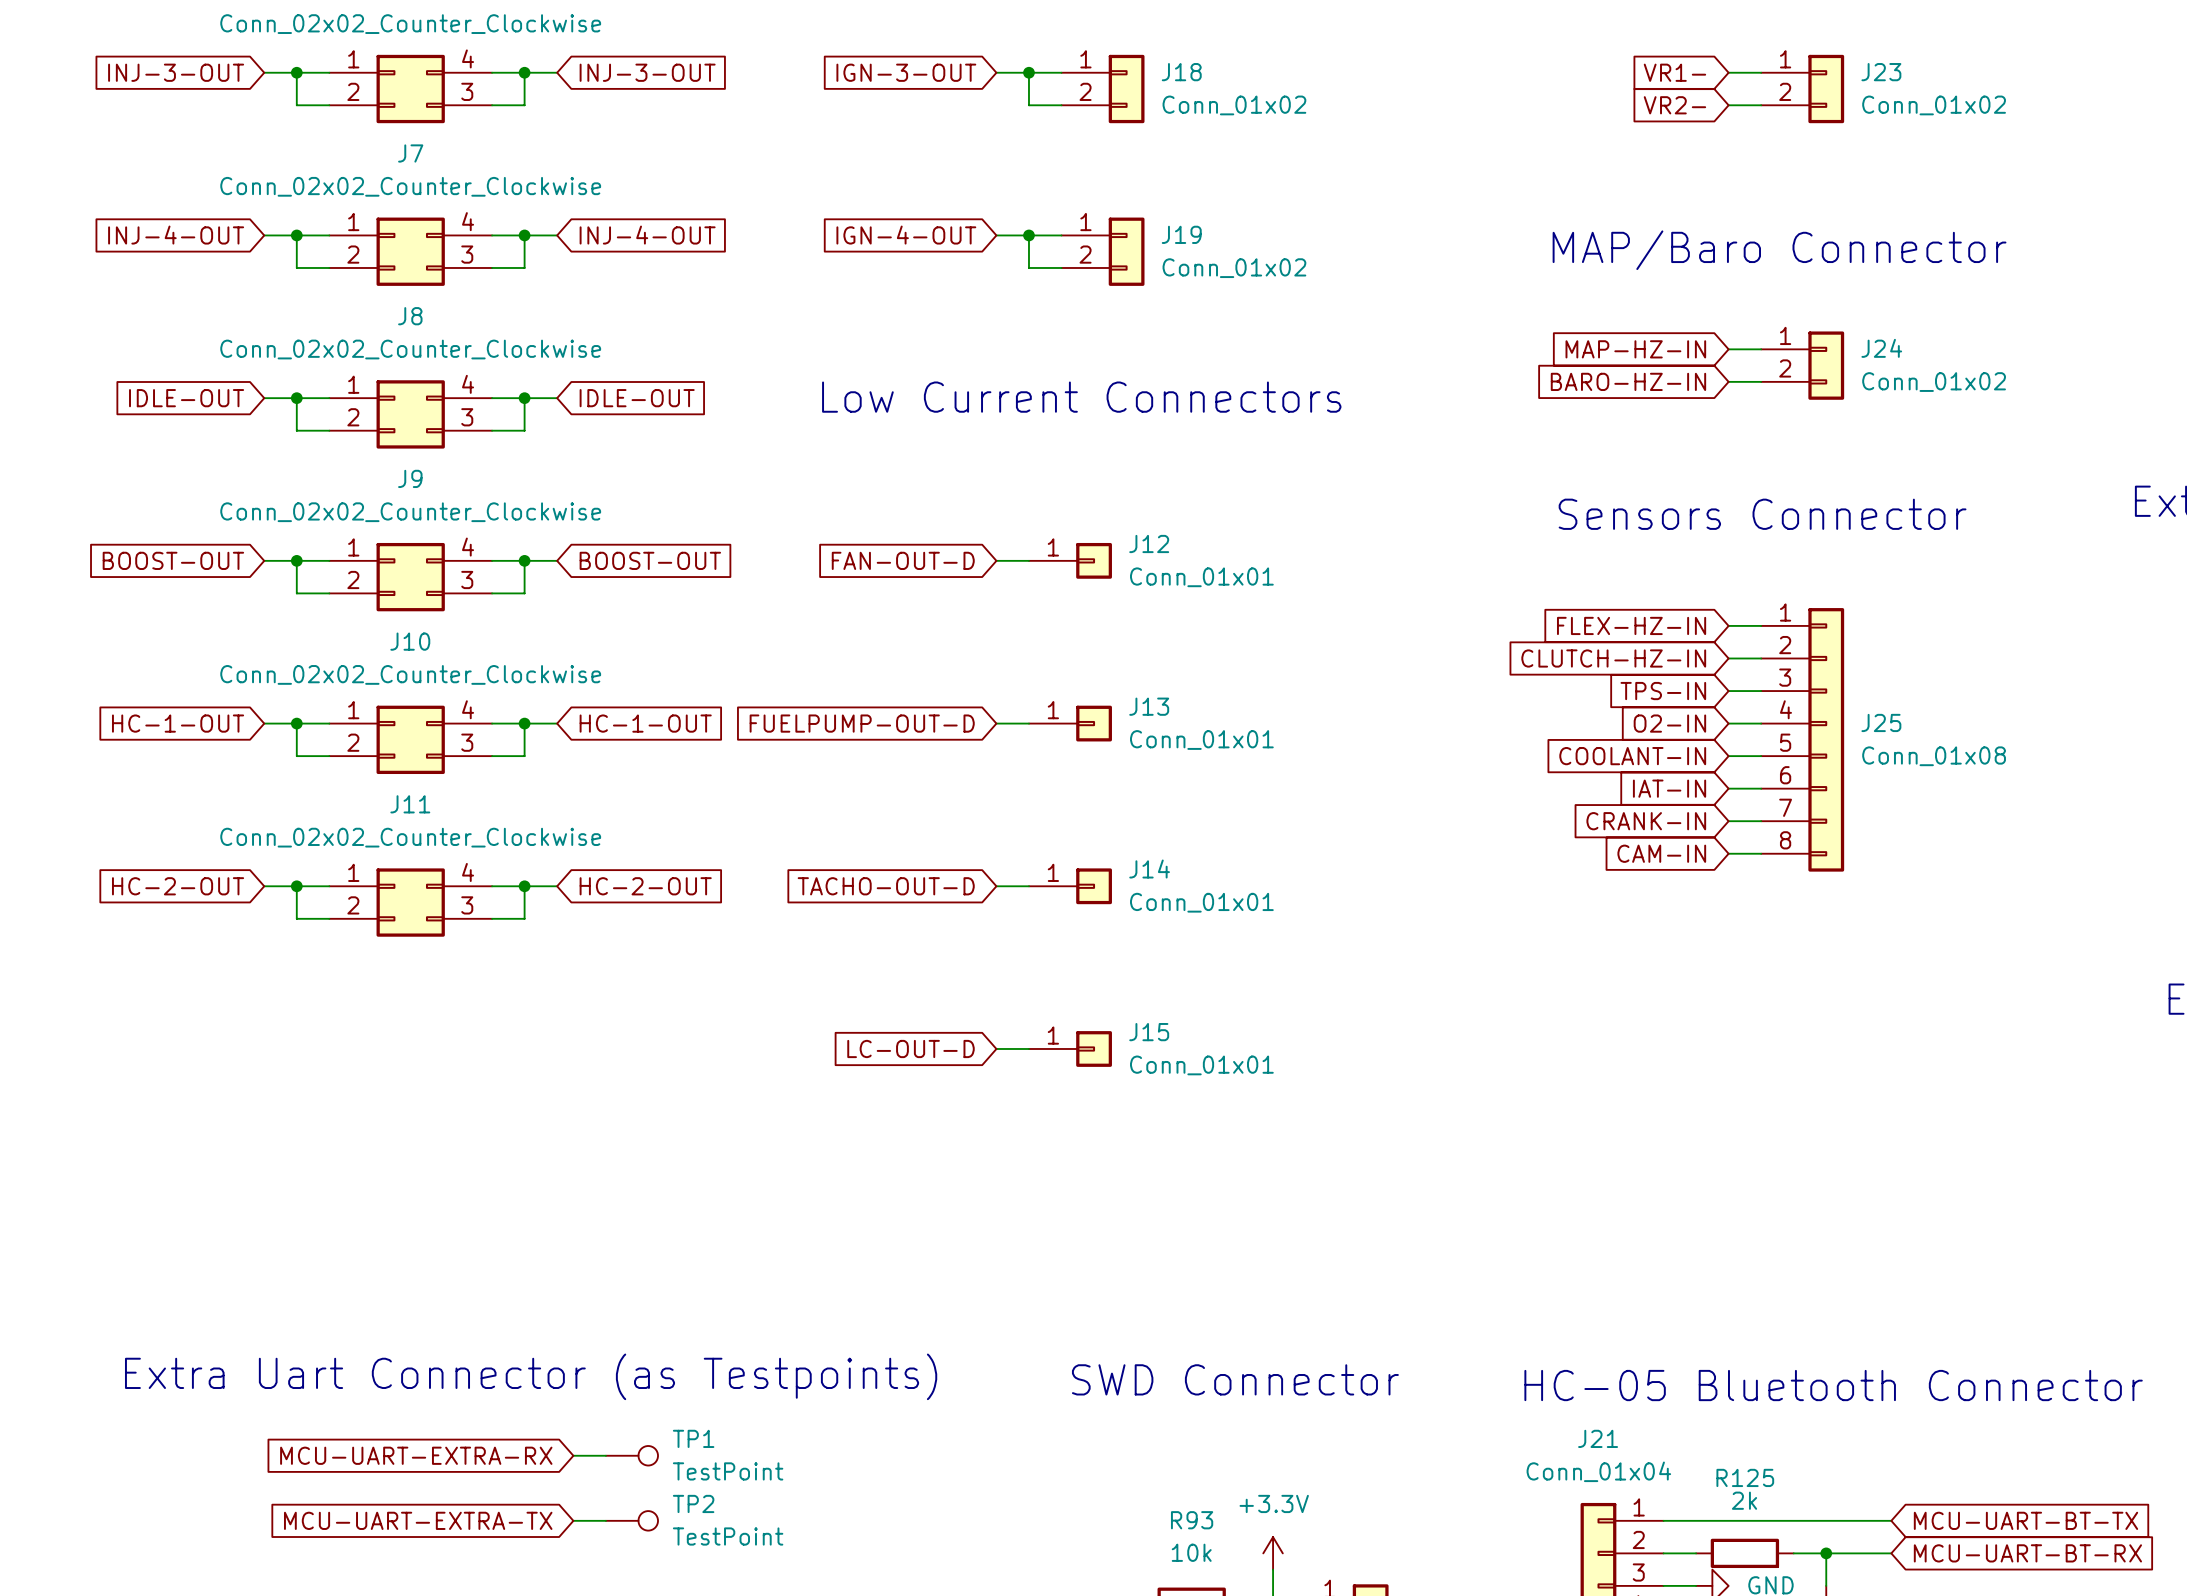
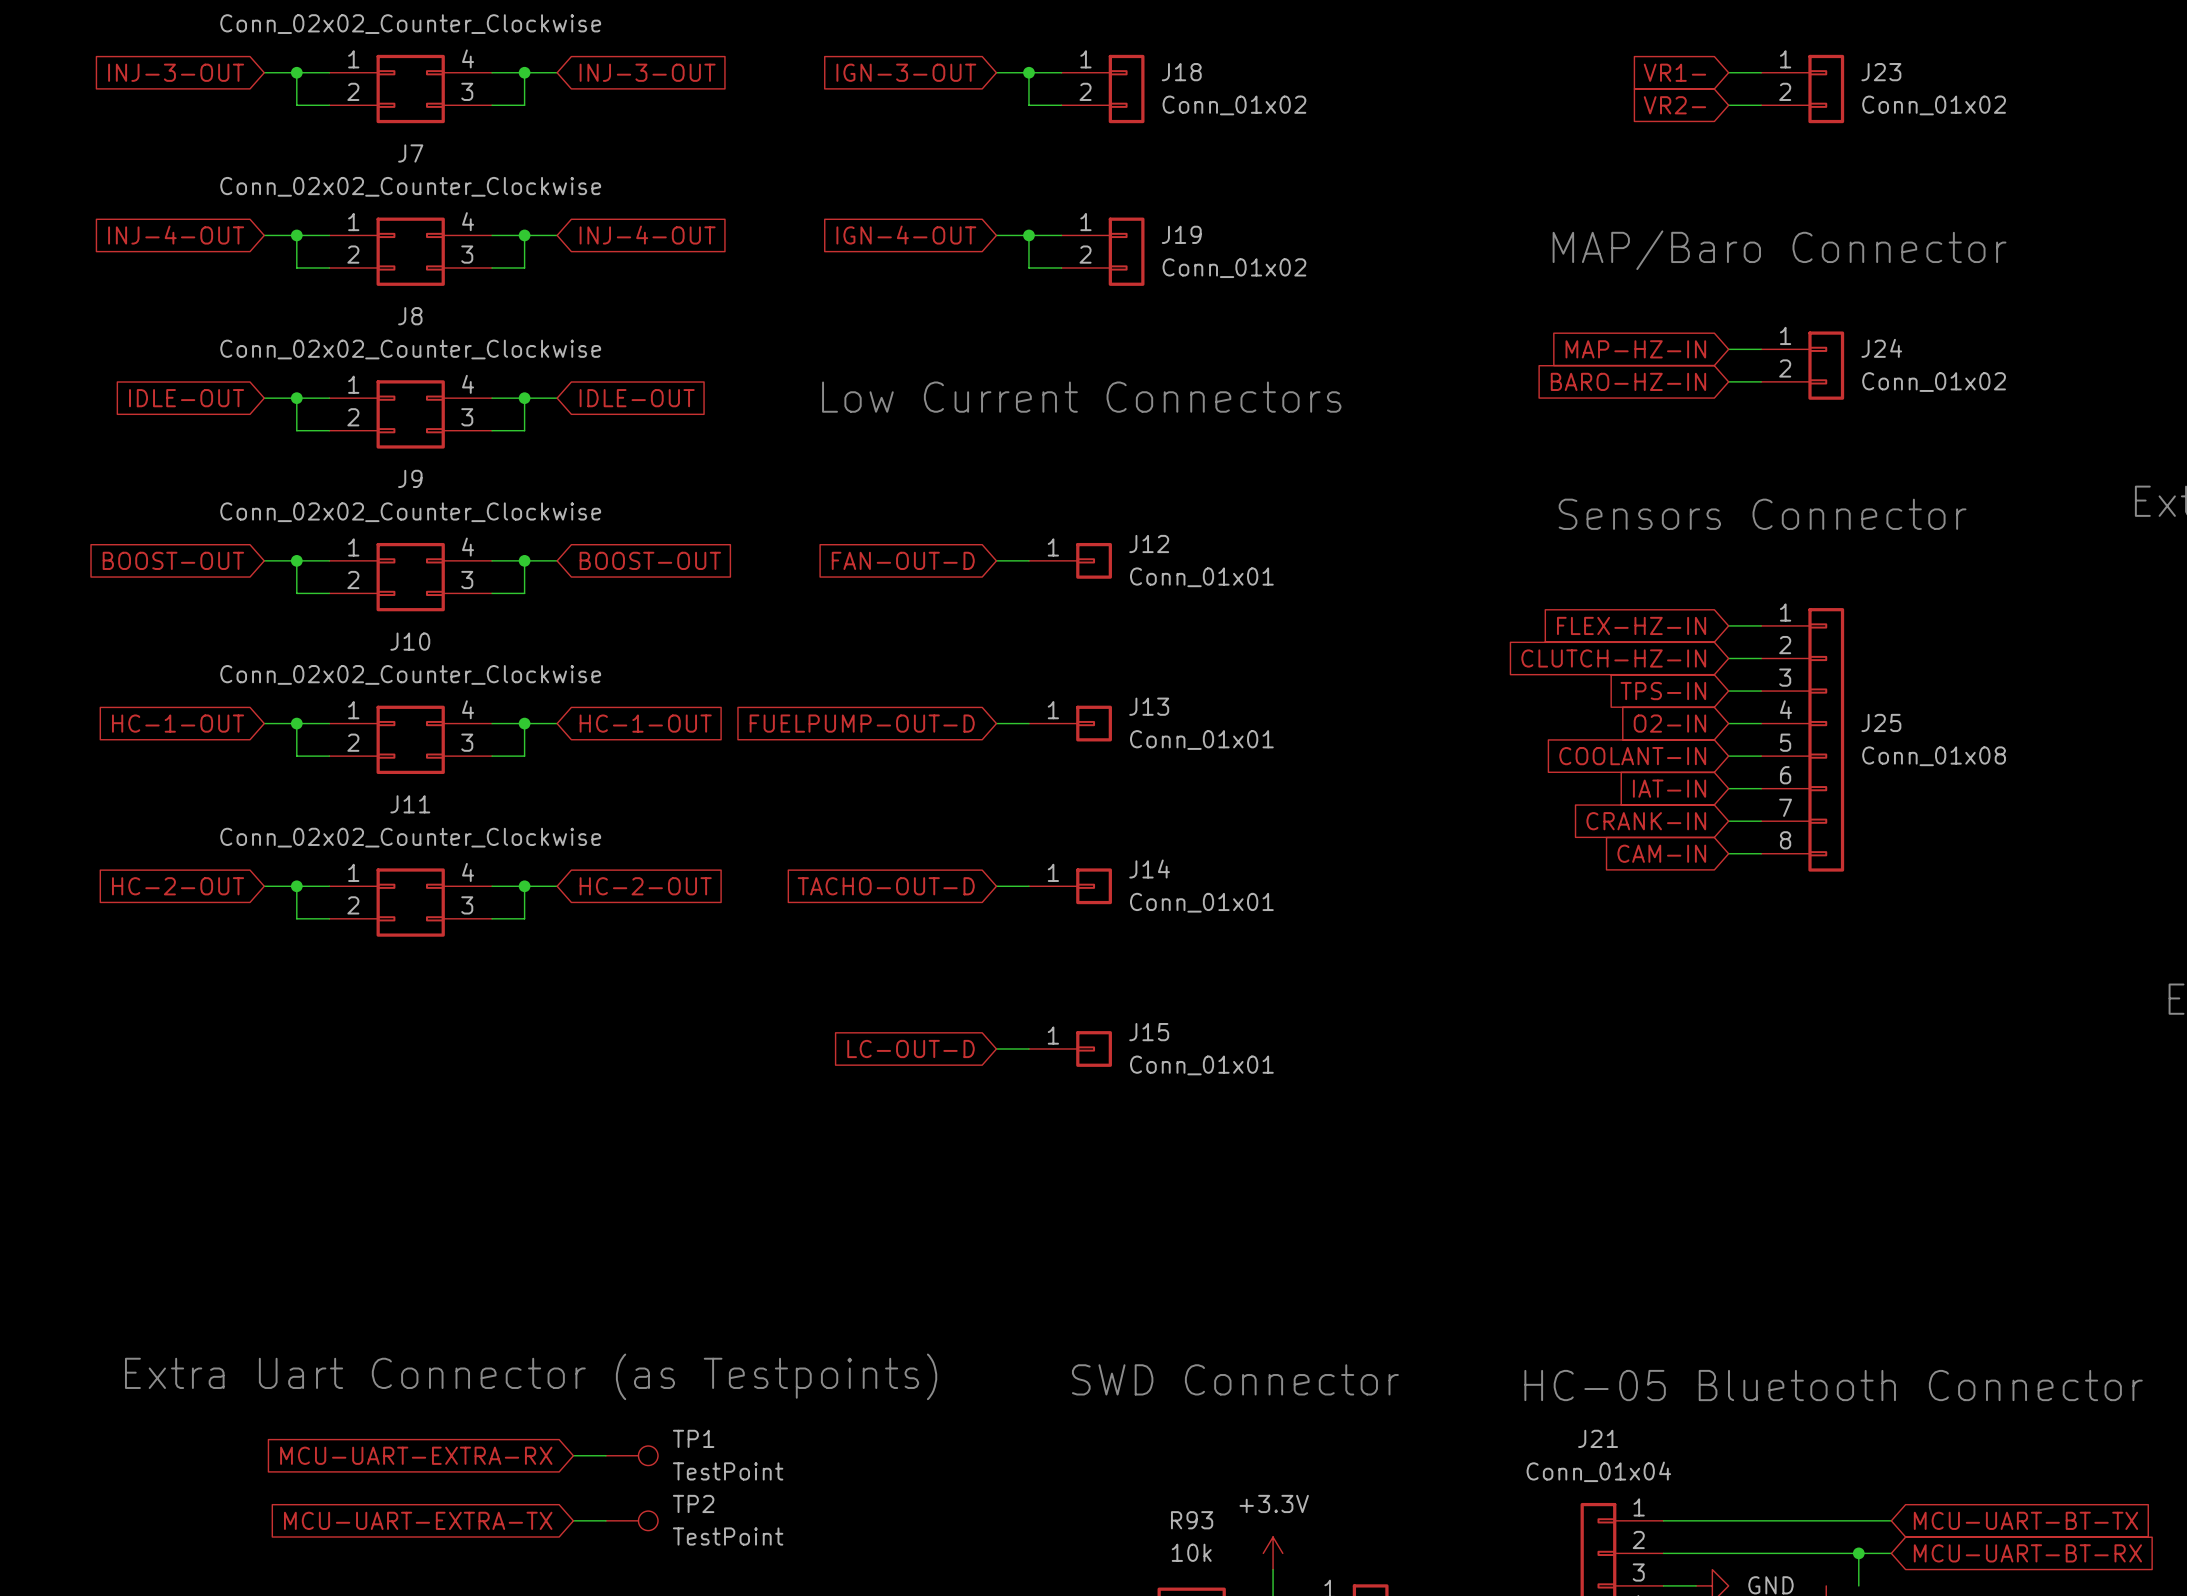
wire: none -> (1696, 1553) (1793, 1553)
R125: 2k (1744, 1553) -> none
wire: (1826, 1553) (1826, 1585) -> (1858, 1553) (1858, 1585)
junction position: (1826, 1553) -> (1858, 1553)

